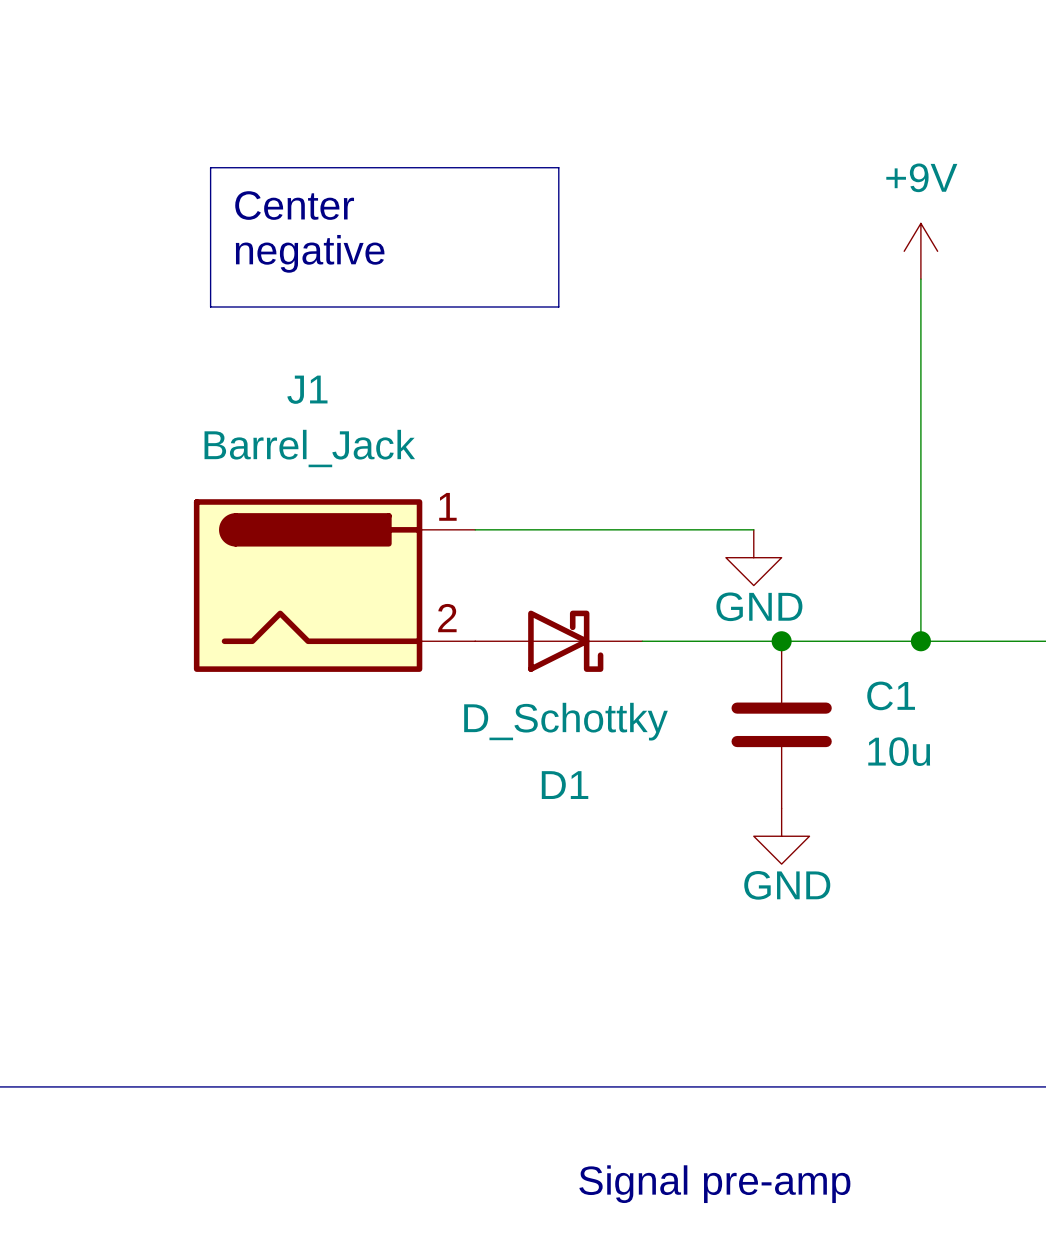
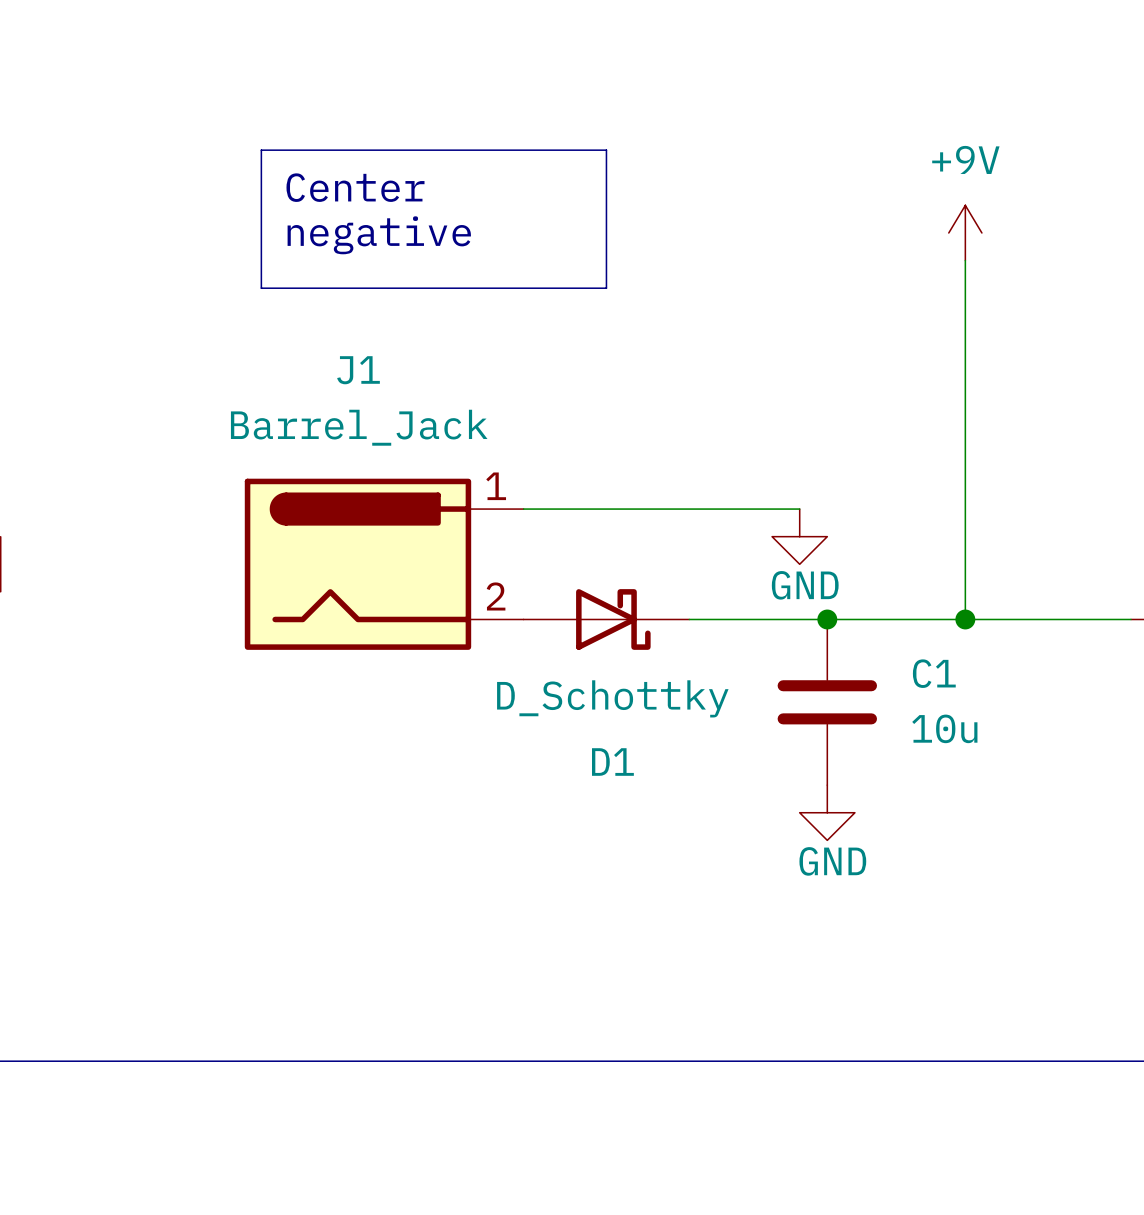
text: Signal pre-amp (714, 1184) -> none

